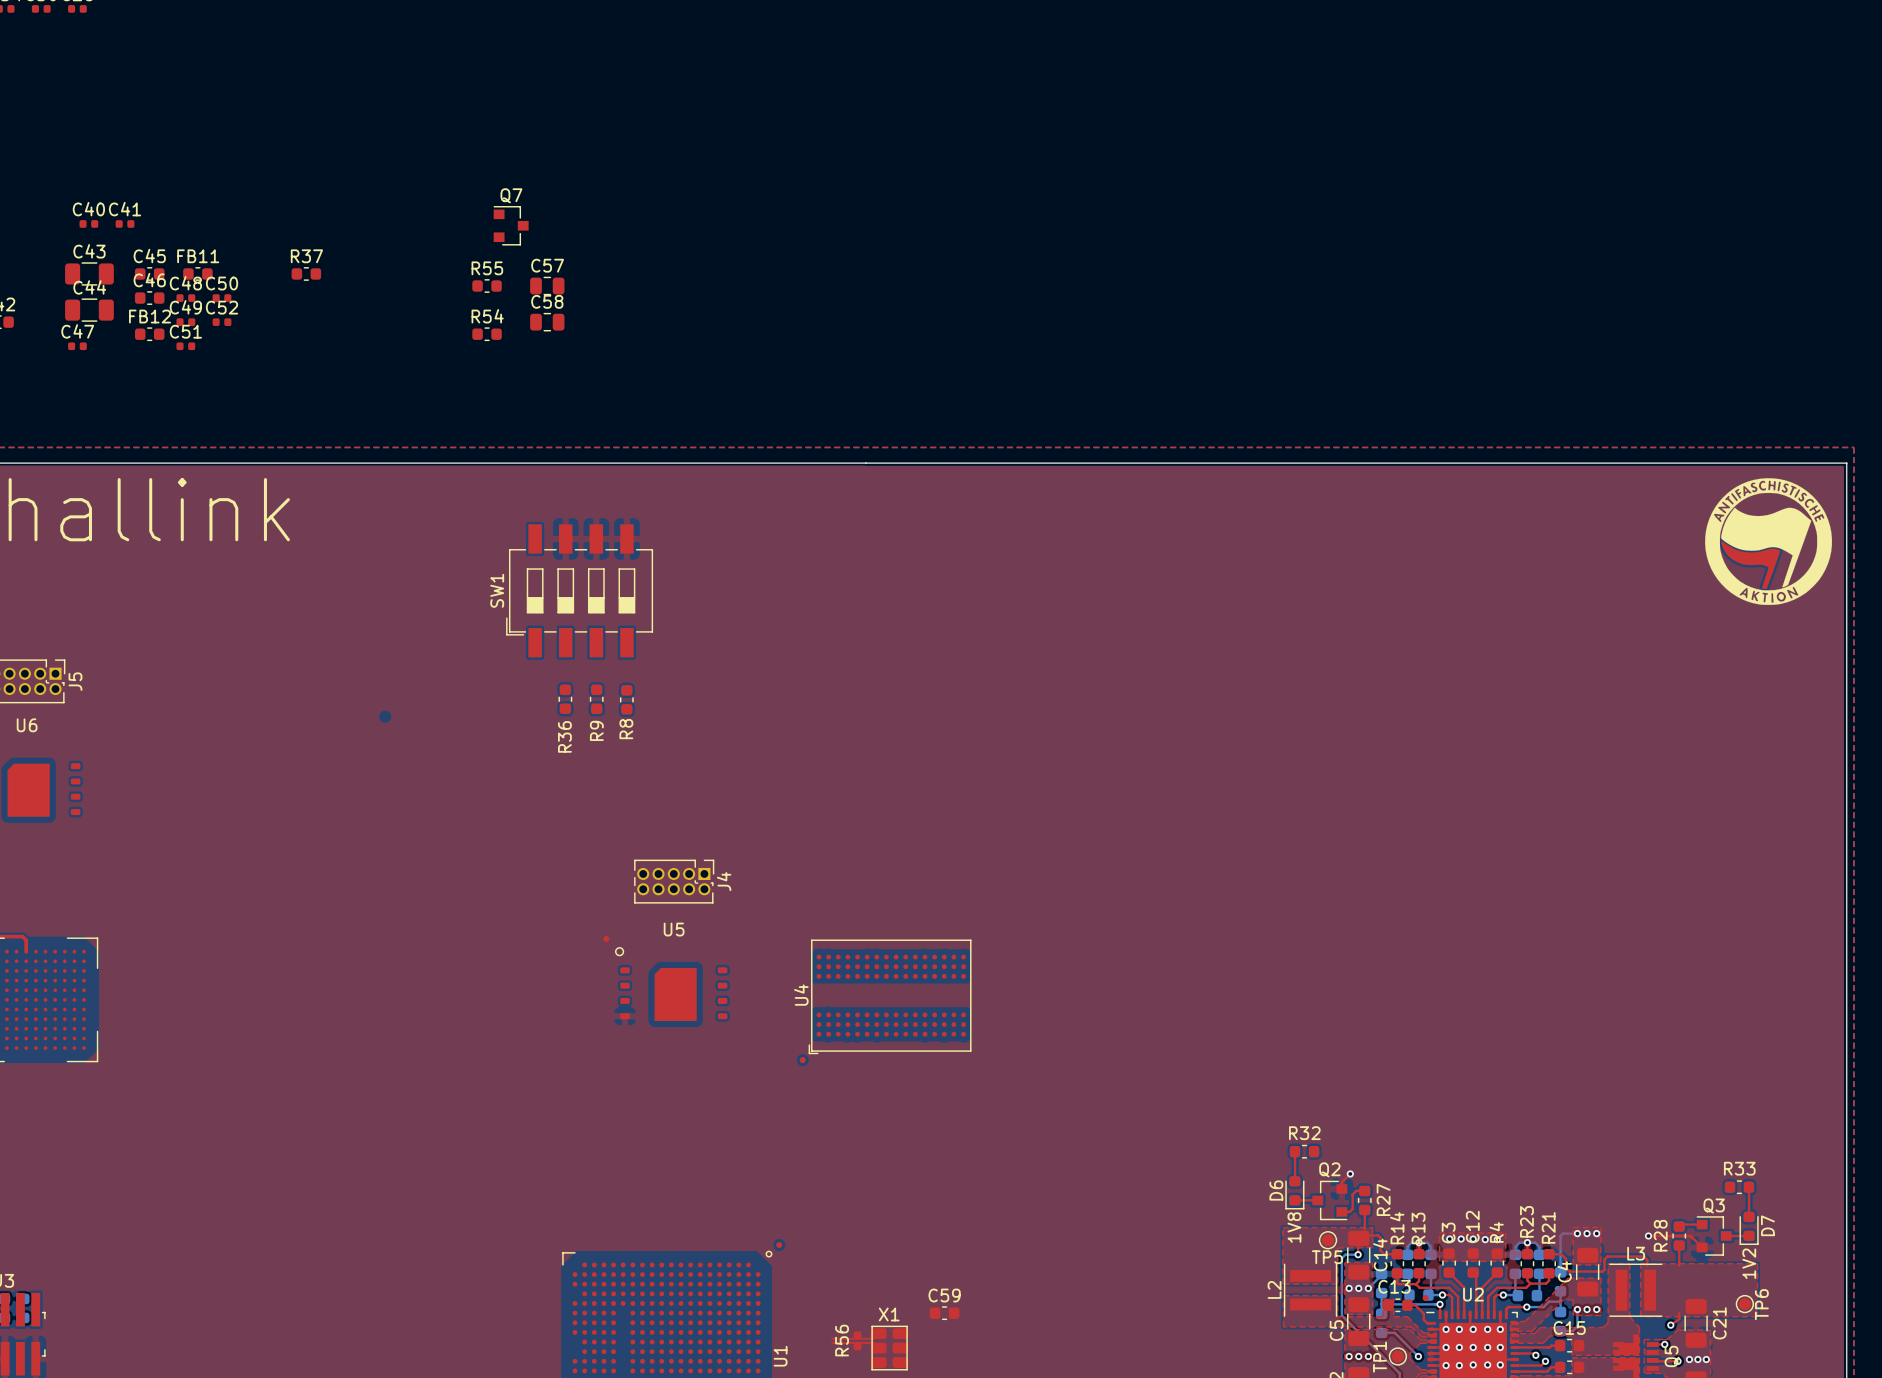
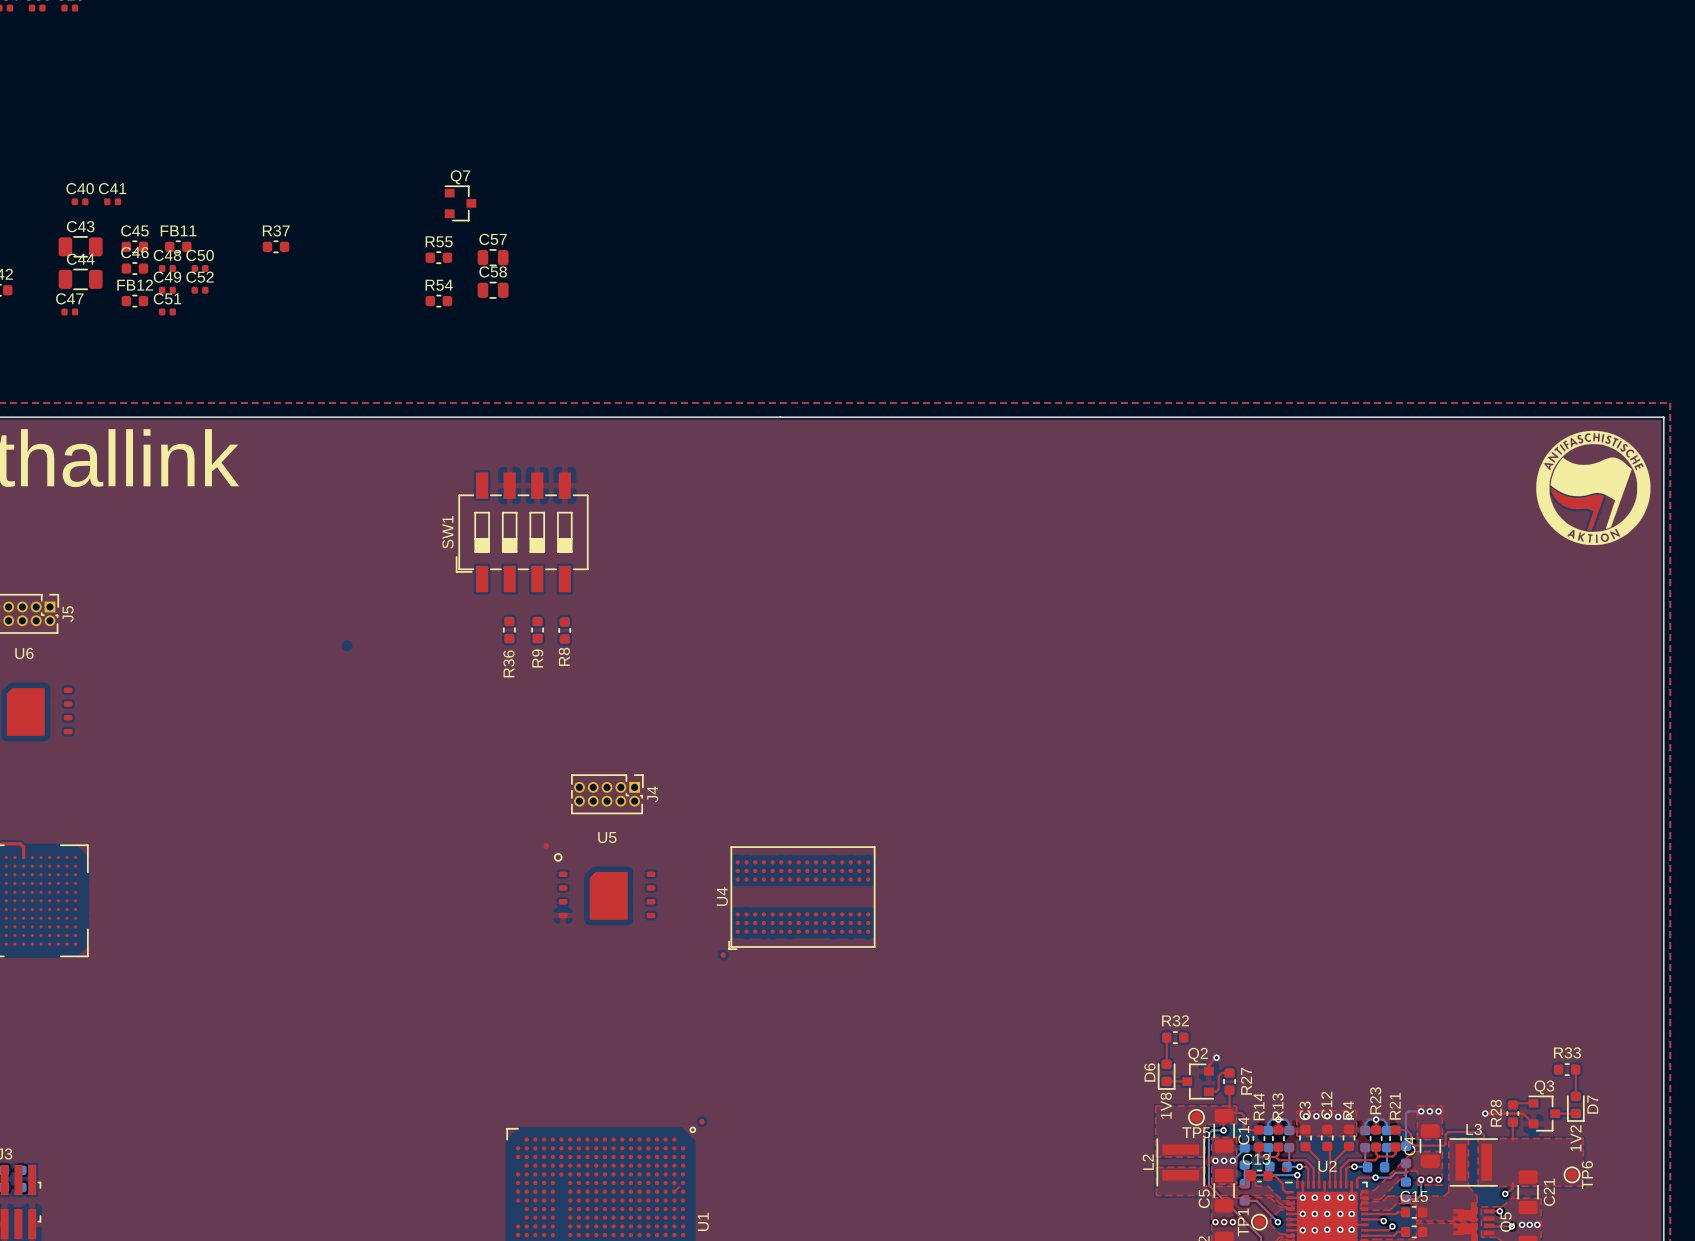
C59: (944, 1313) -> none
top track: none -> (679, 1187) (674, 1191)
top track: (878, 1333) (873, 1338) (832, 1338) -> none
R56: (857, 1340) -> none
top track: (832, 1342) (873, 1342) (878, 1348) -> none
X1: (889, 1348) -> none

